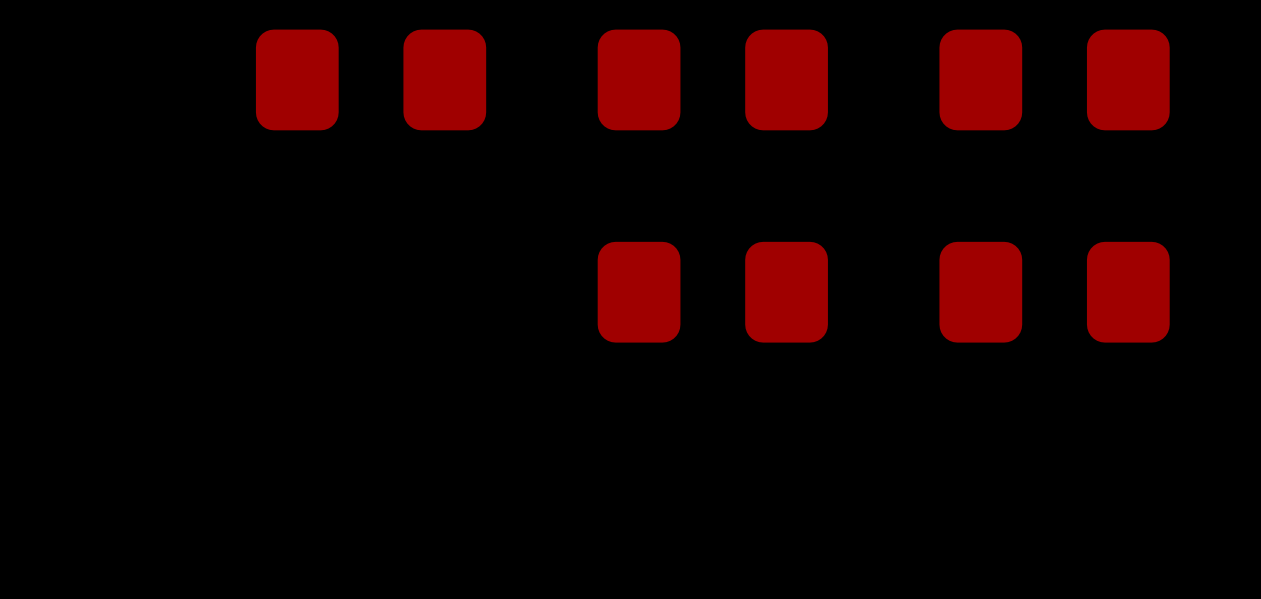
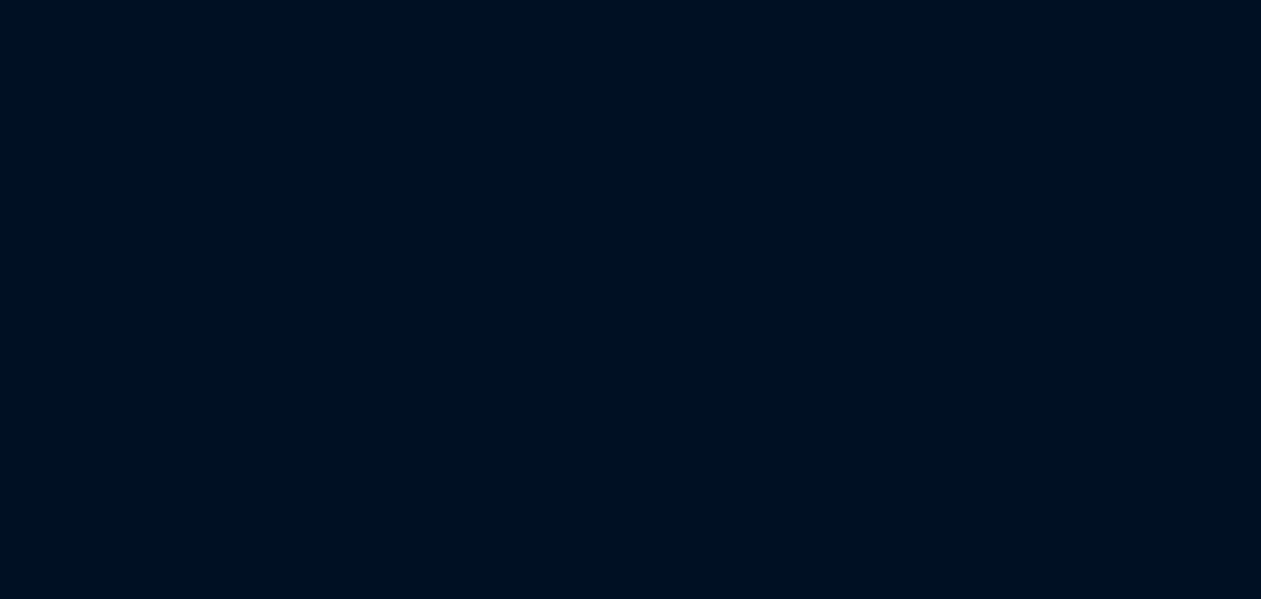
part: (371, 79) -> none
part: (712, 79) -> none
part: (1054, 79) -> none
part: (712, 292) -> none
part: (1054, 292) -> none

